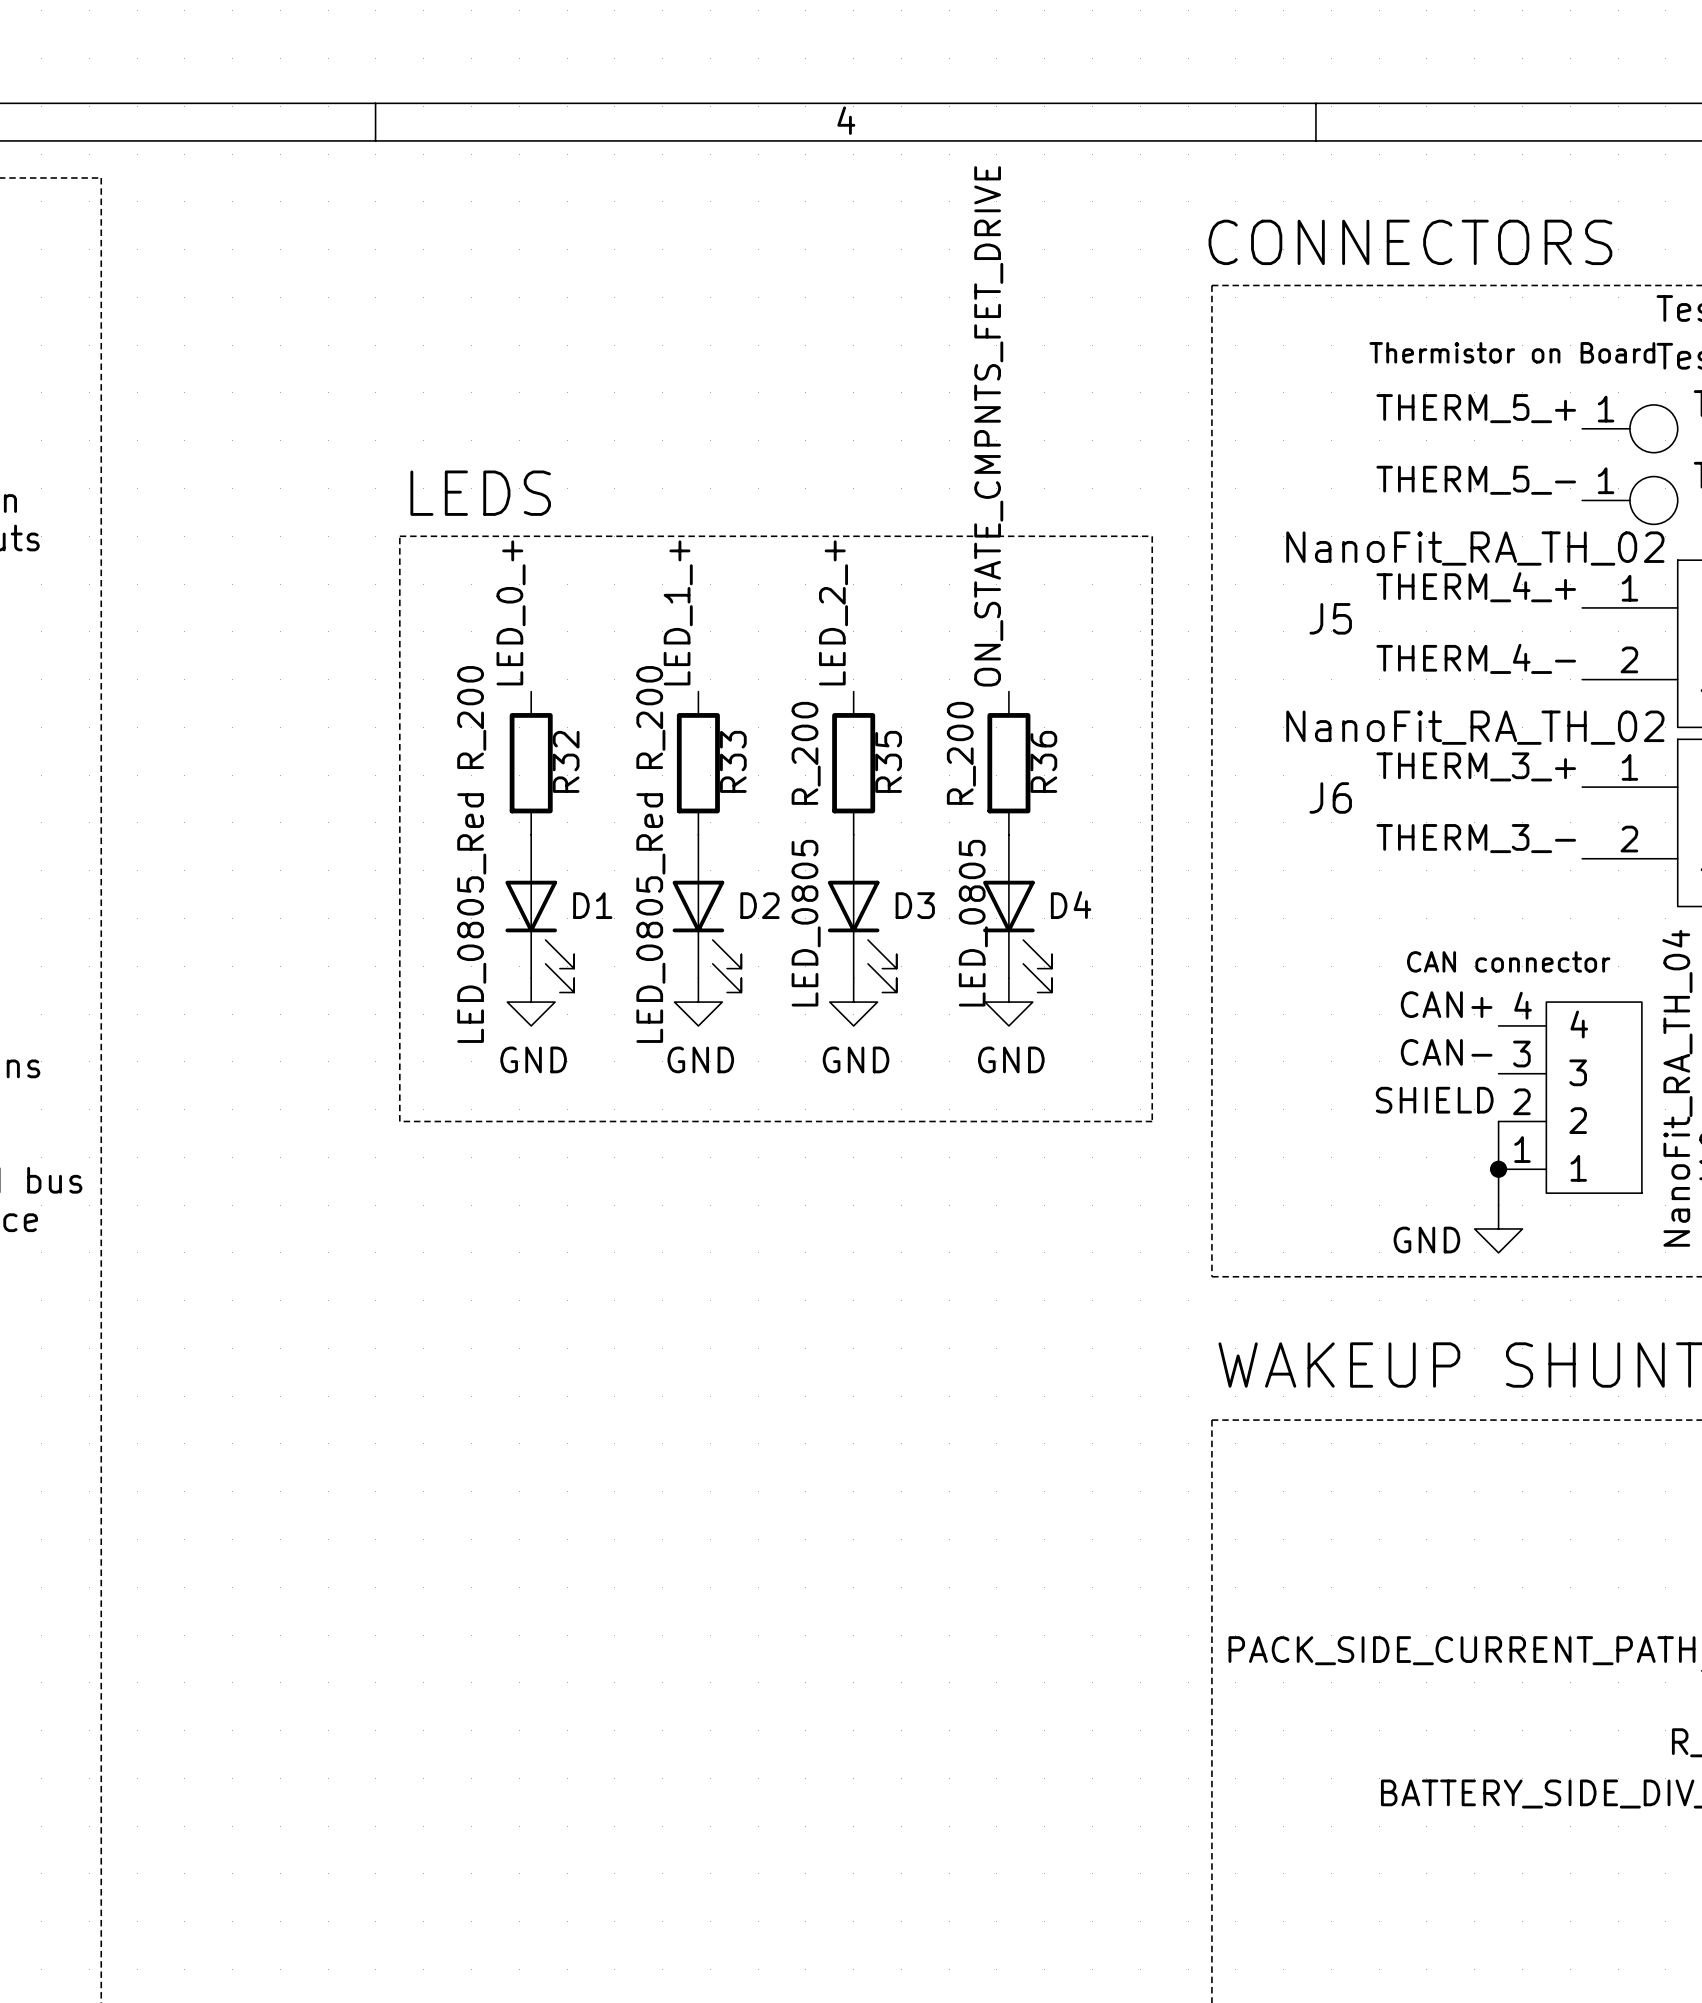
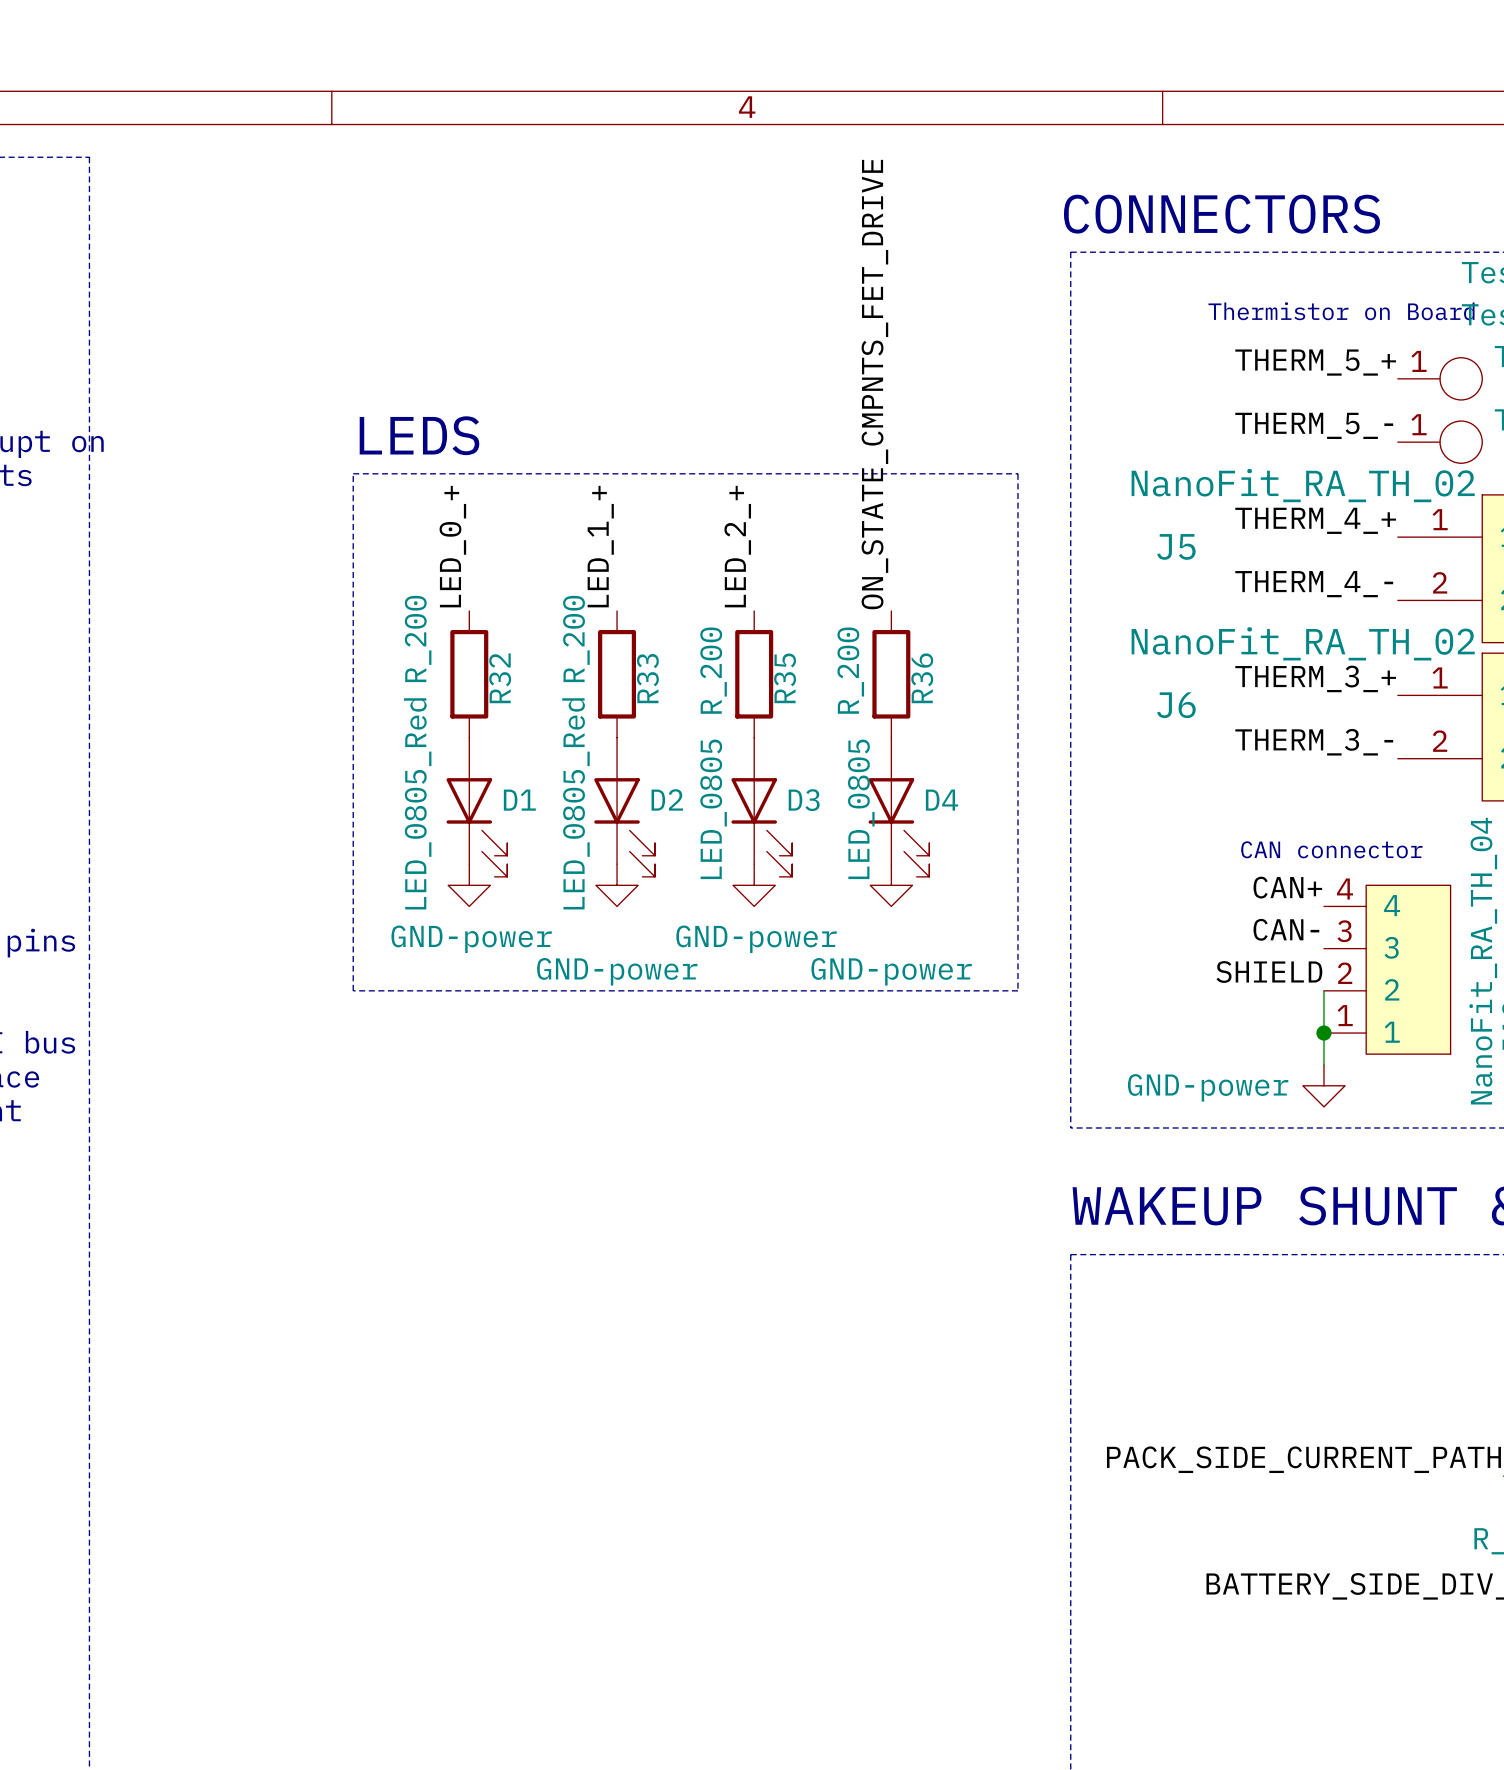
power symbol: GND (531, 1002) -> GND-power (469, 885)
power symbol: GND (698, 1002) -> GND-power (617, 885)
power symbol: GND (853, 1002) -> GND-power (754, 885)
power symbol: GND (1008, 1002) -> GND-power (891, 885)
power symbol: GND (1498, 1228) -> GND-power (1323, 1085)

